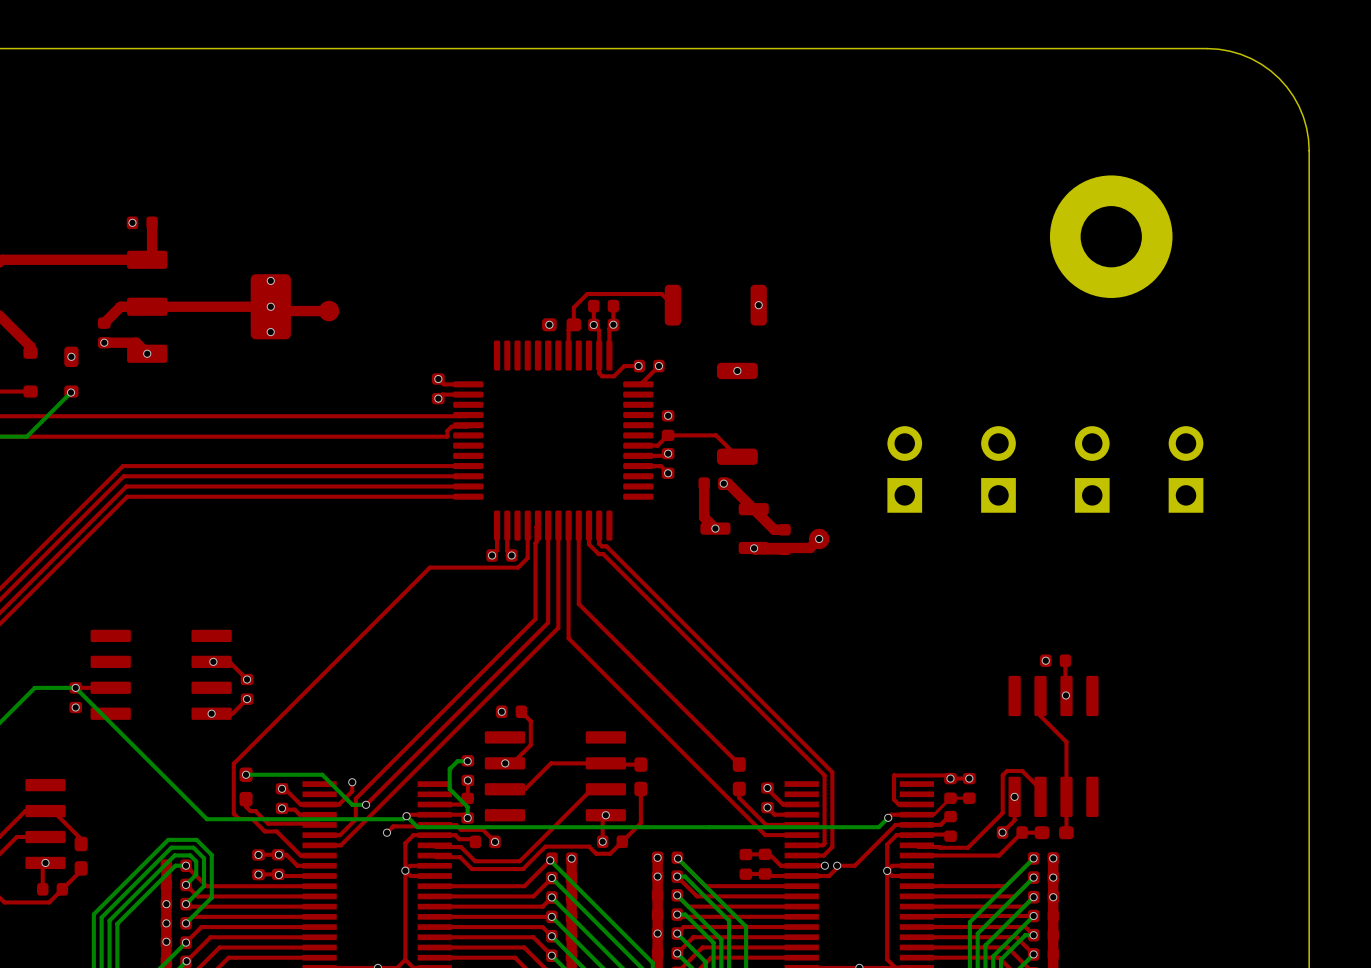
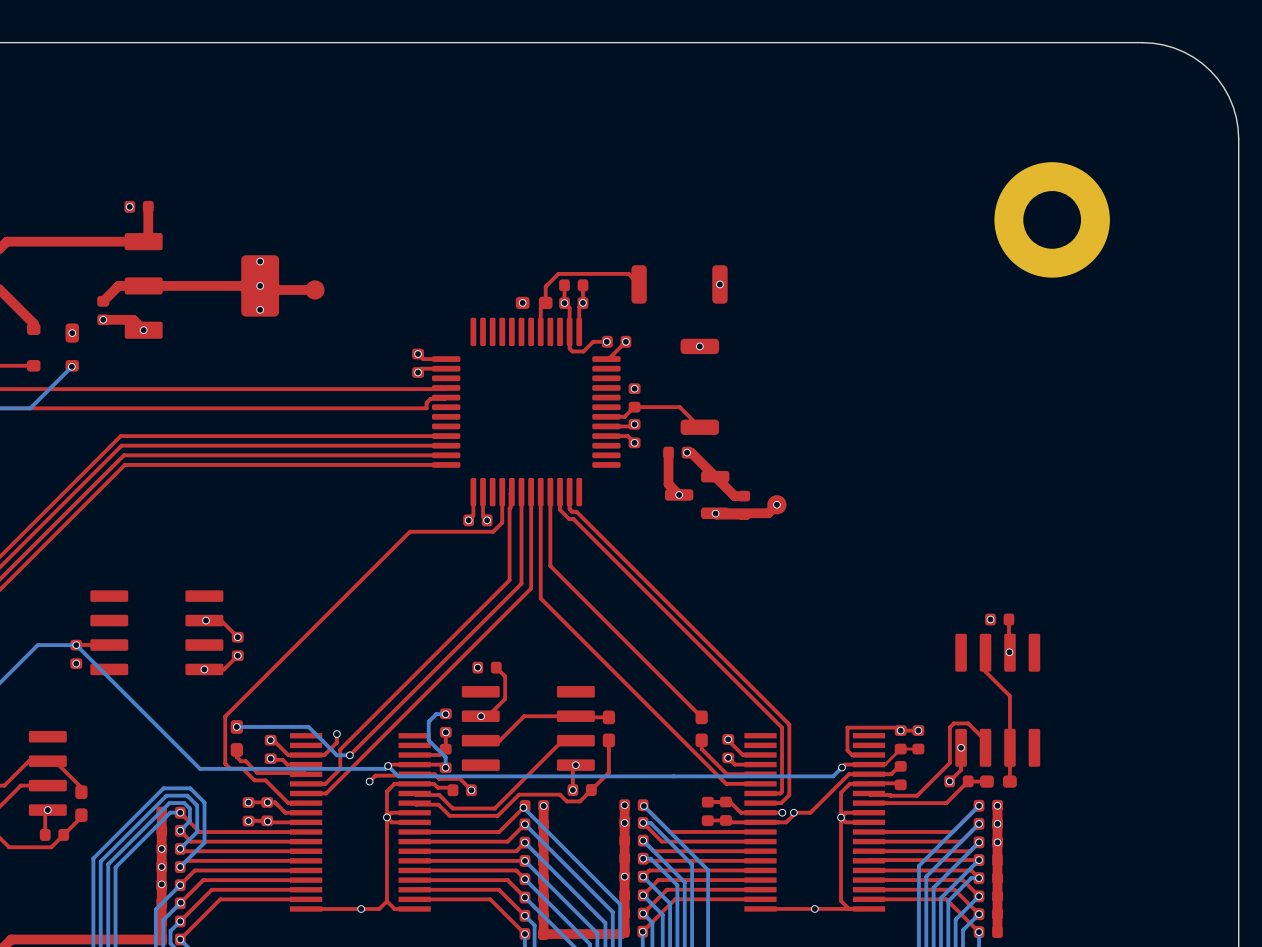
part: (904, 469) -> none
part: (998, 469) -> none
part: (1092, 469) -> none
part: (1186, 469) -> none

